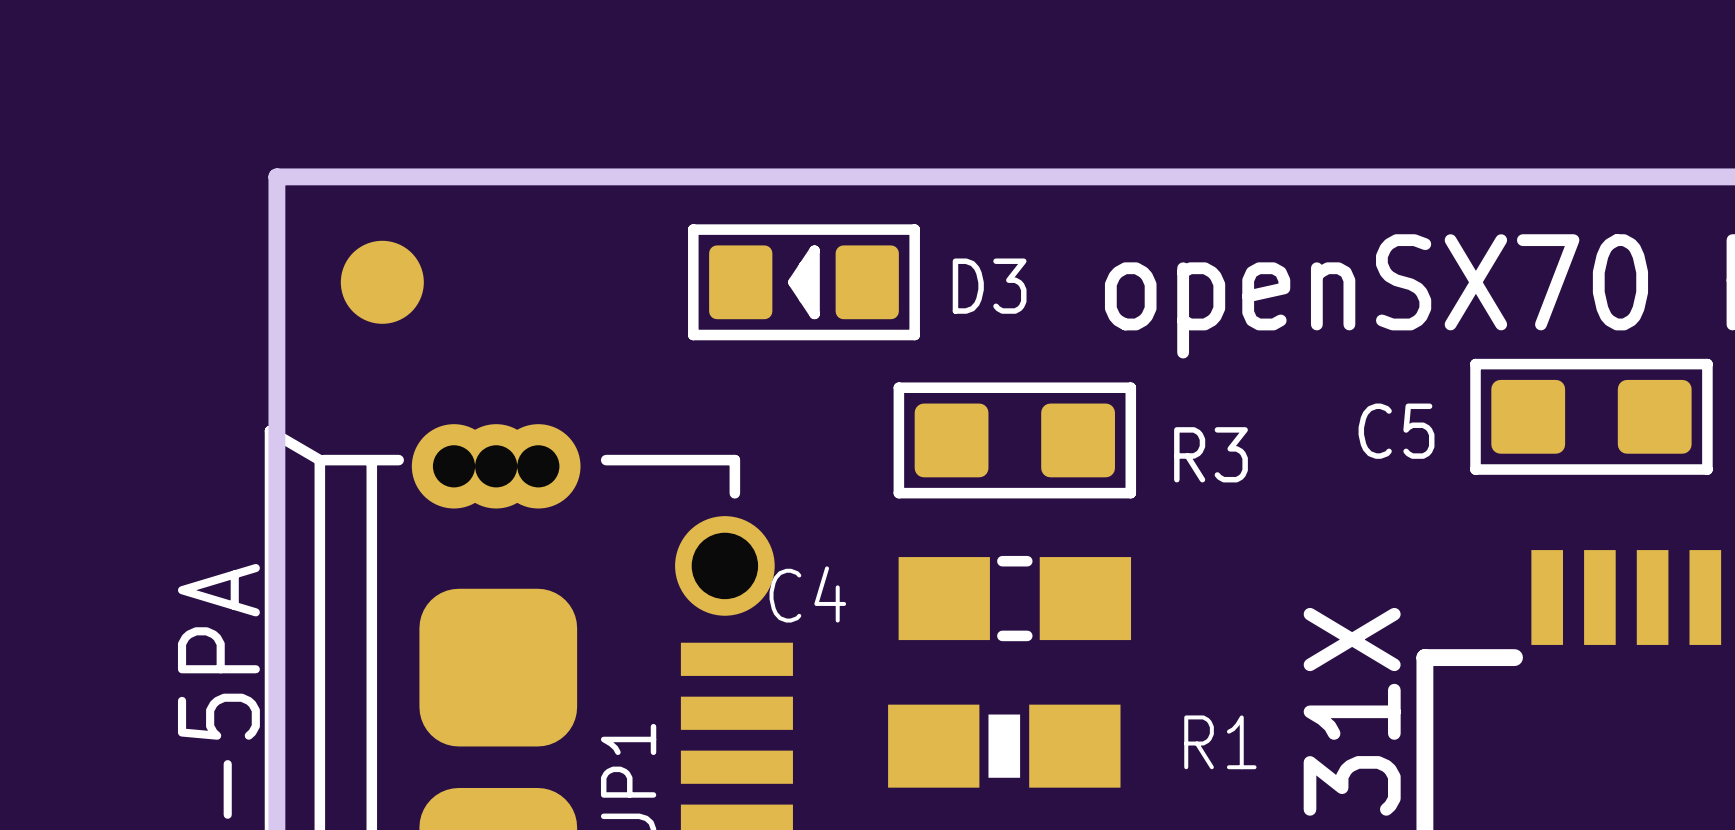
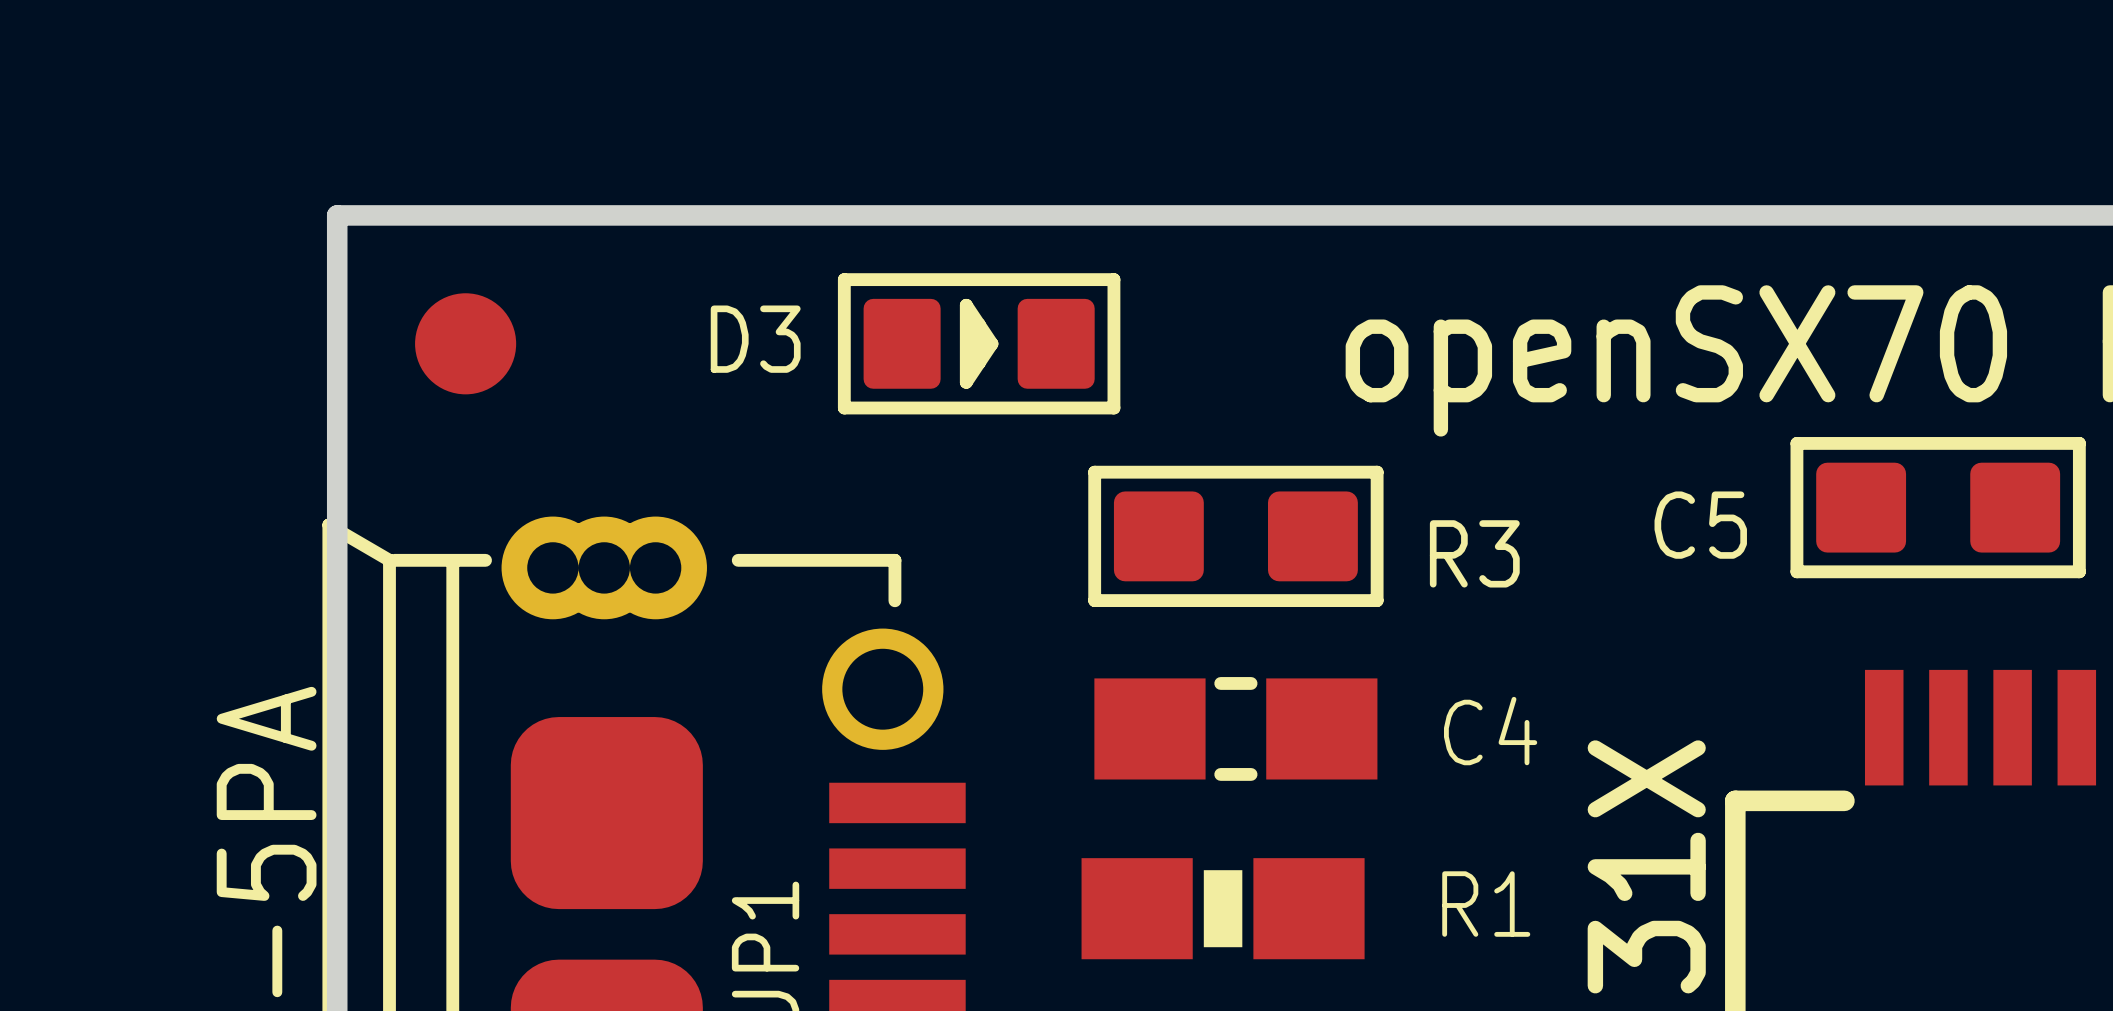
D3 rotation: 0° (803, 282) -> 180° (979, 343)
C4 name position: C4 (807, 594) -> C4 (1490, 731)

